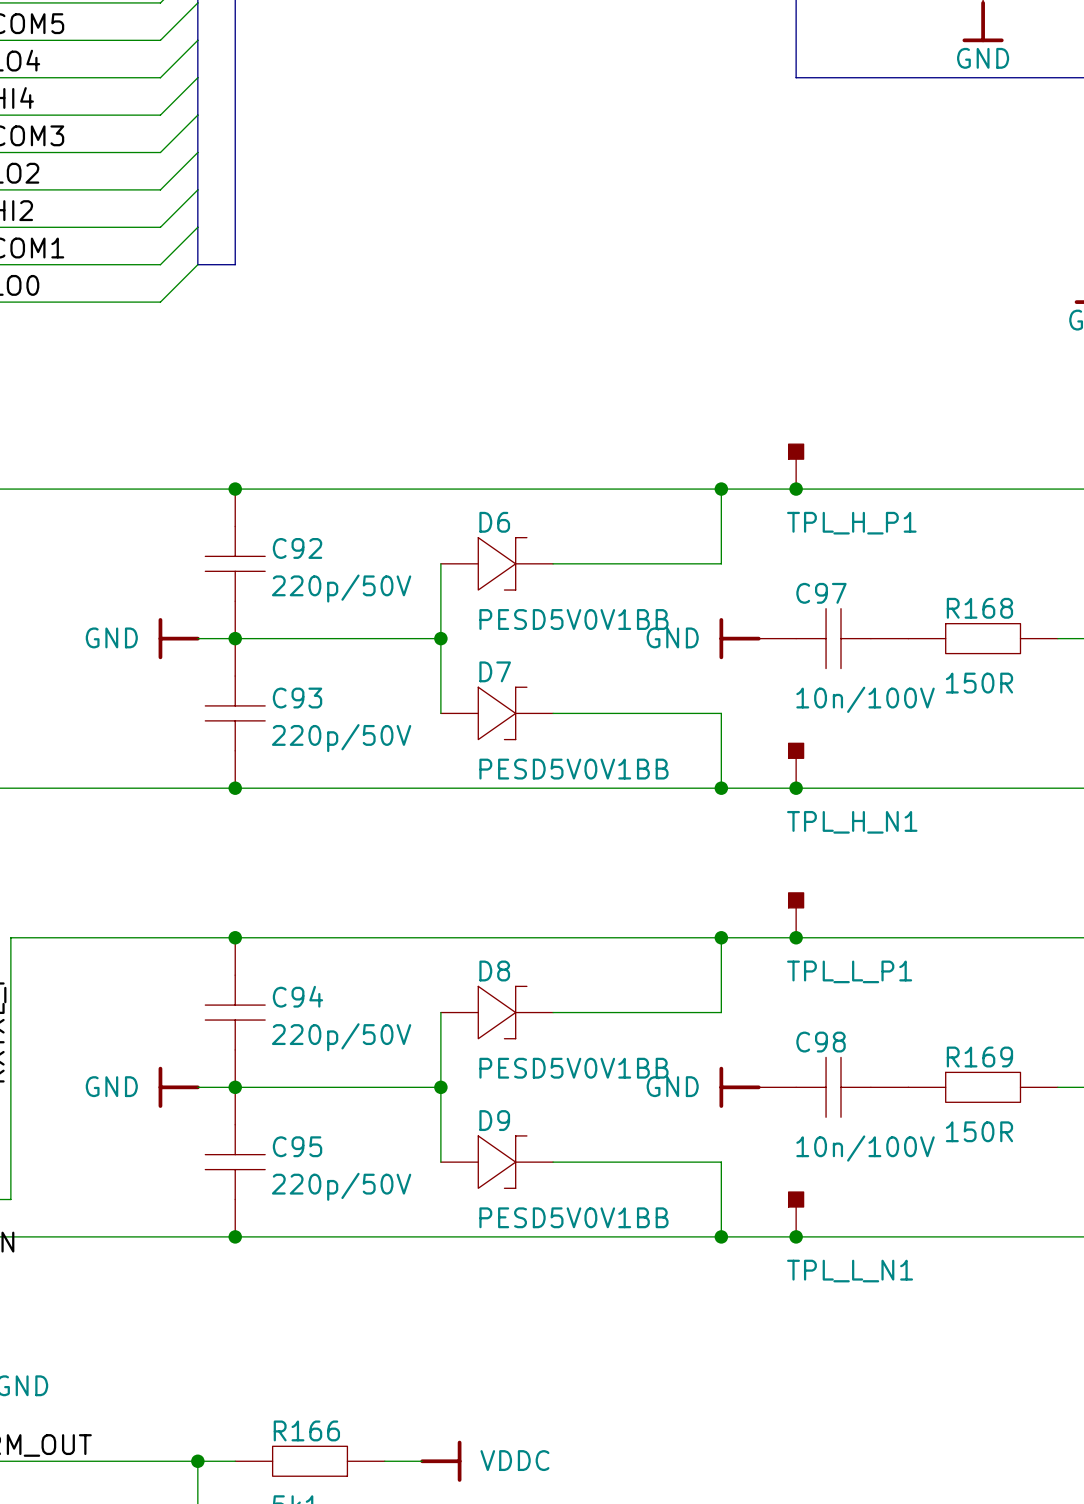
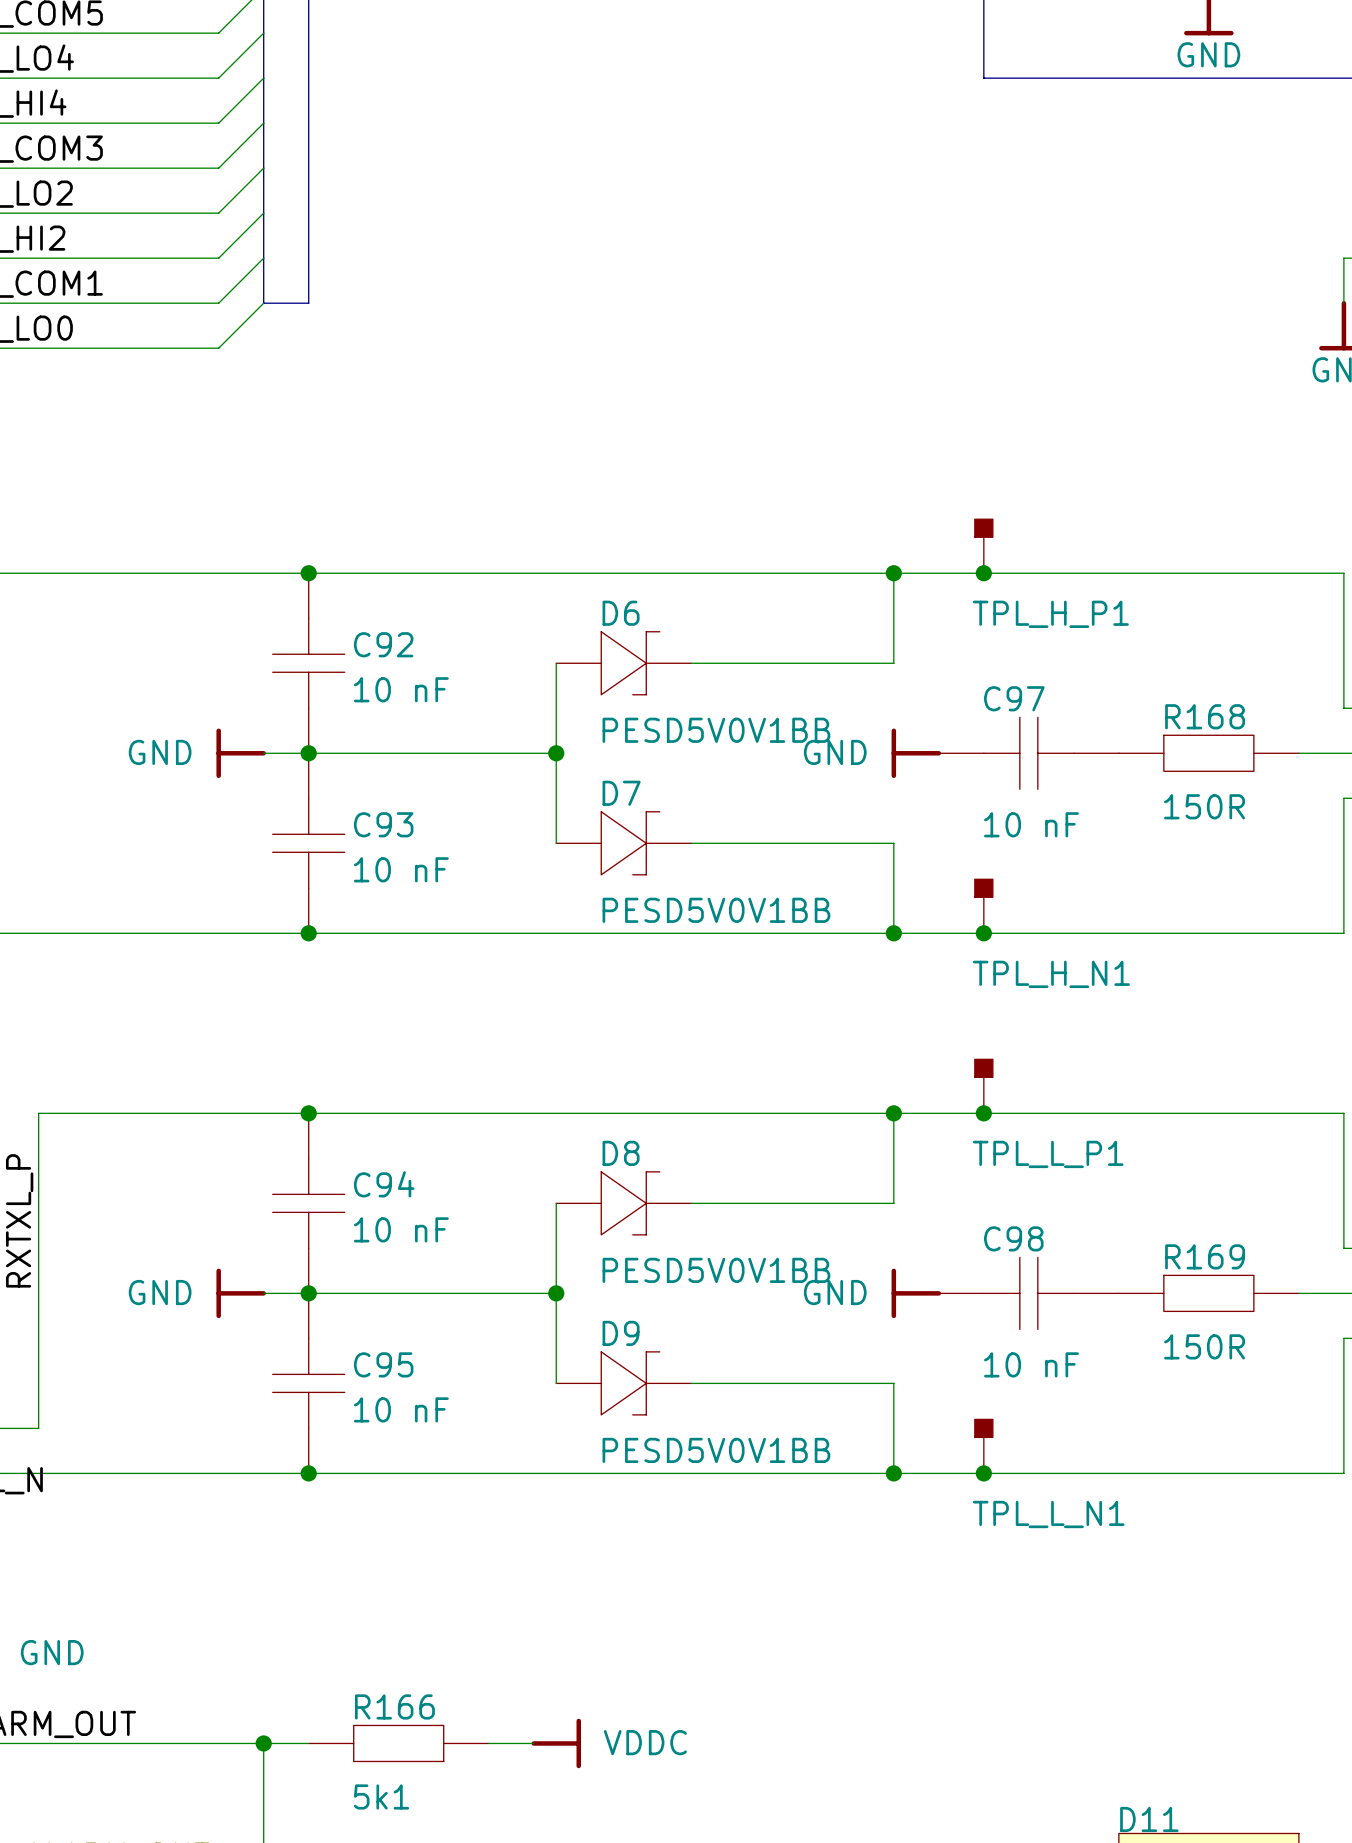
C92 value: 220p/50V (341, 588) -> 10 nF (401, 689)
C97 value: 10n/100V (865, 699) -> 10 nF (1031, 824)
C93 value: 220p/50V (341, 738) -> 10 nF (401, 869)
C94 value: 220p/50V (341, 1037) -> 10 nF (401, 1229)
C98 value: 10n/100V (865, 1148) -> 10 nF (1031, 1364)
C95 value: 220p/50V (341, 1186) -> 10 nF (401, 1409)

